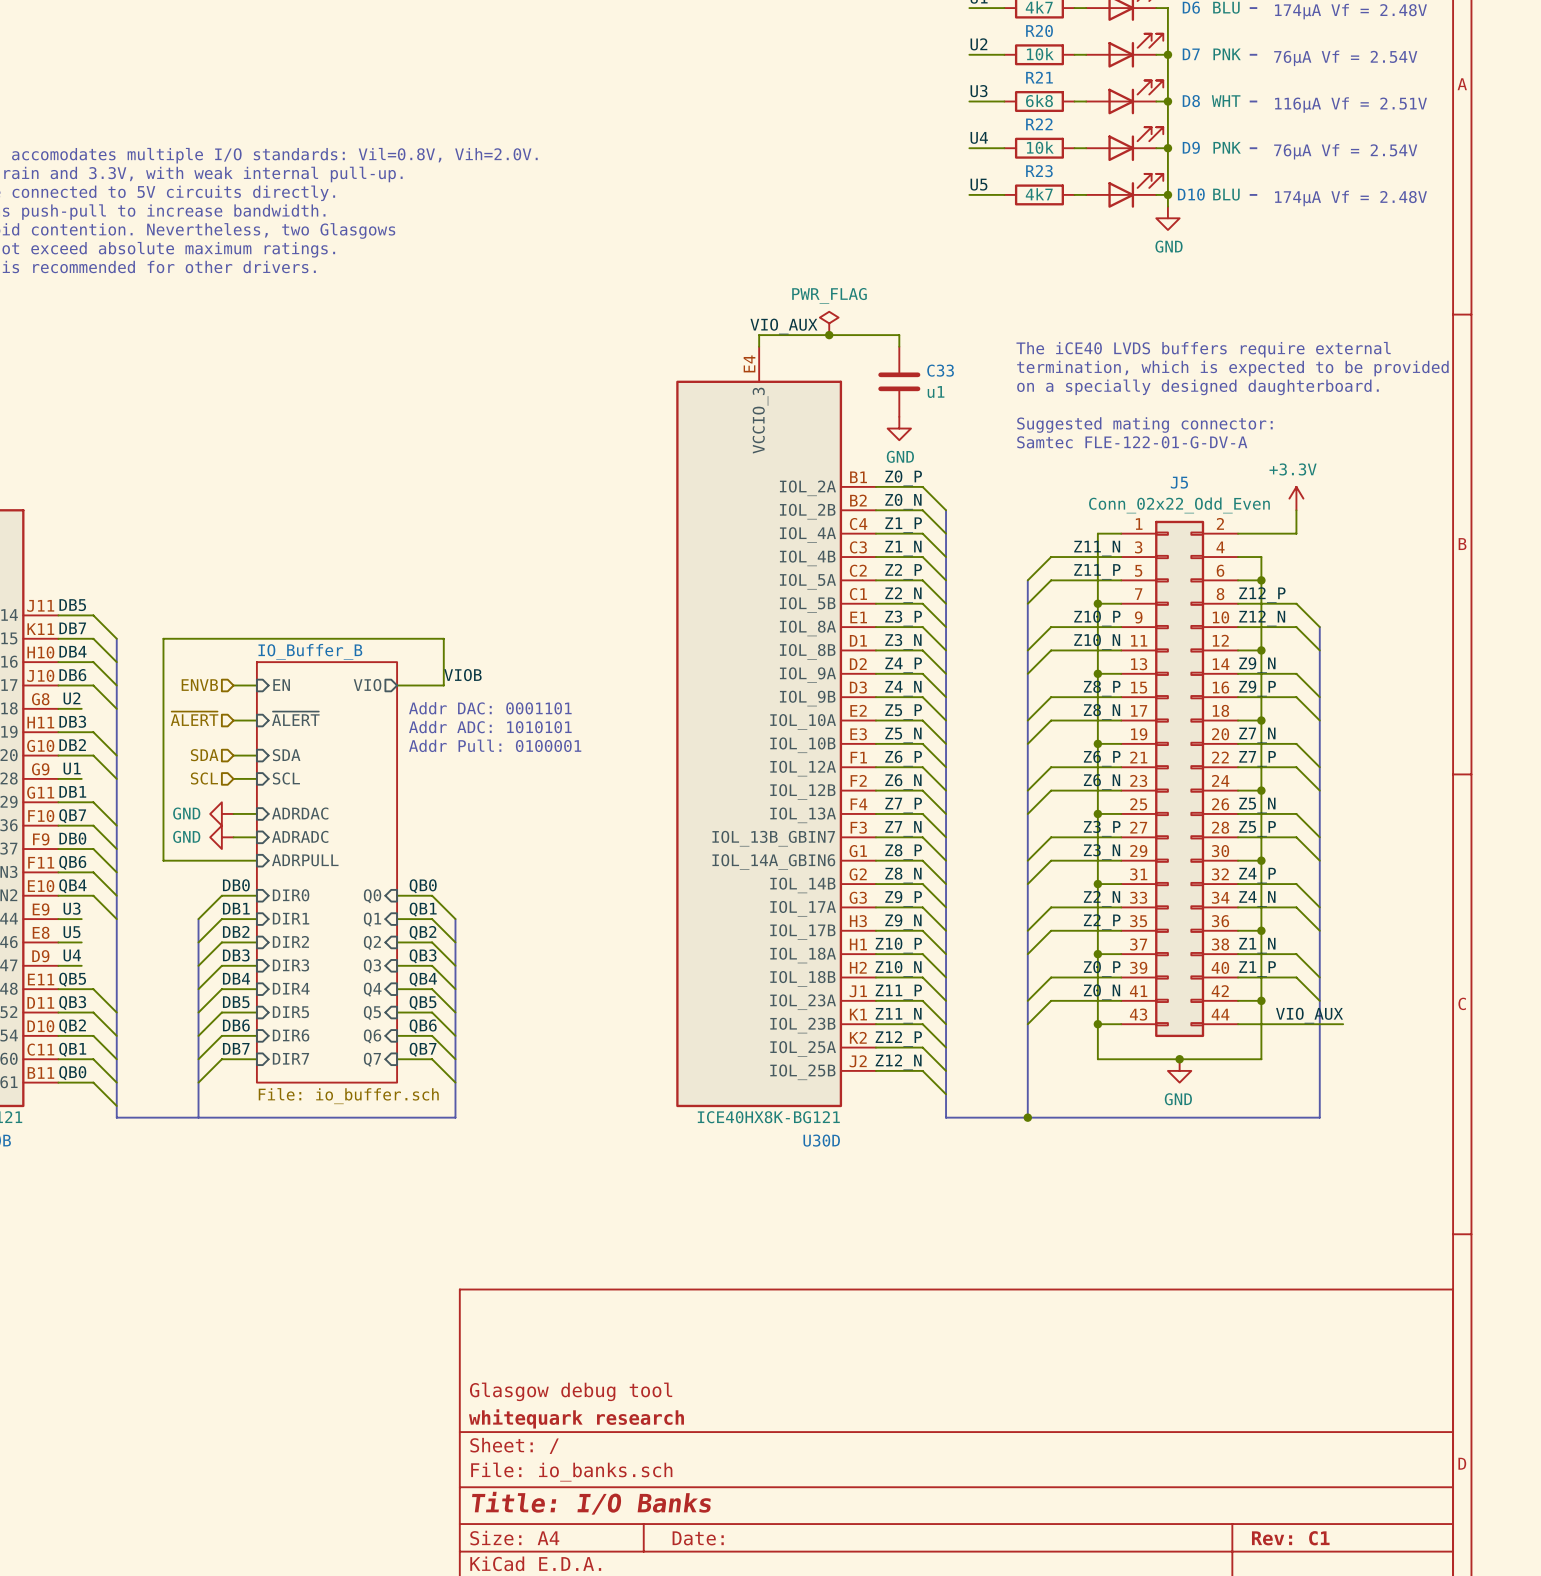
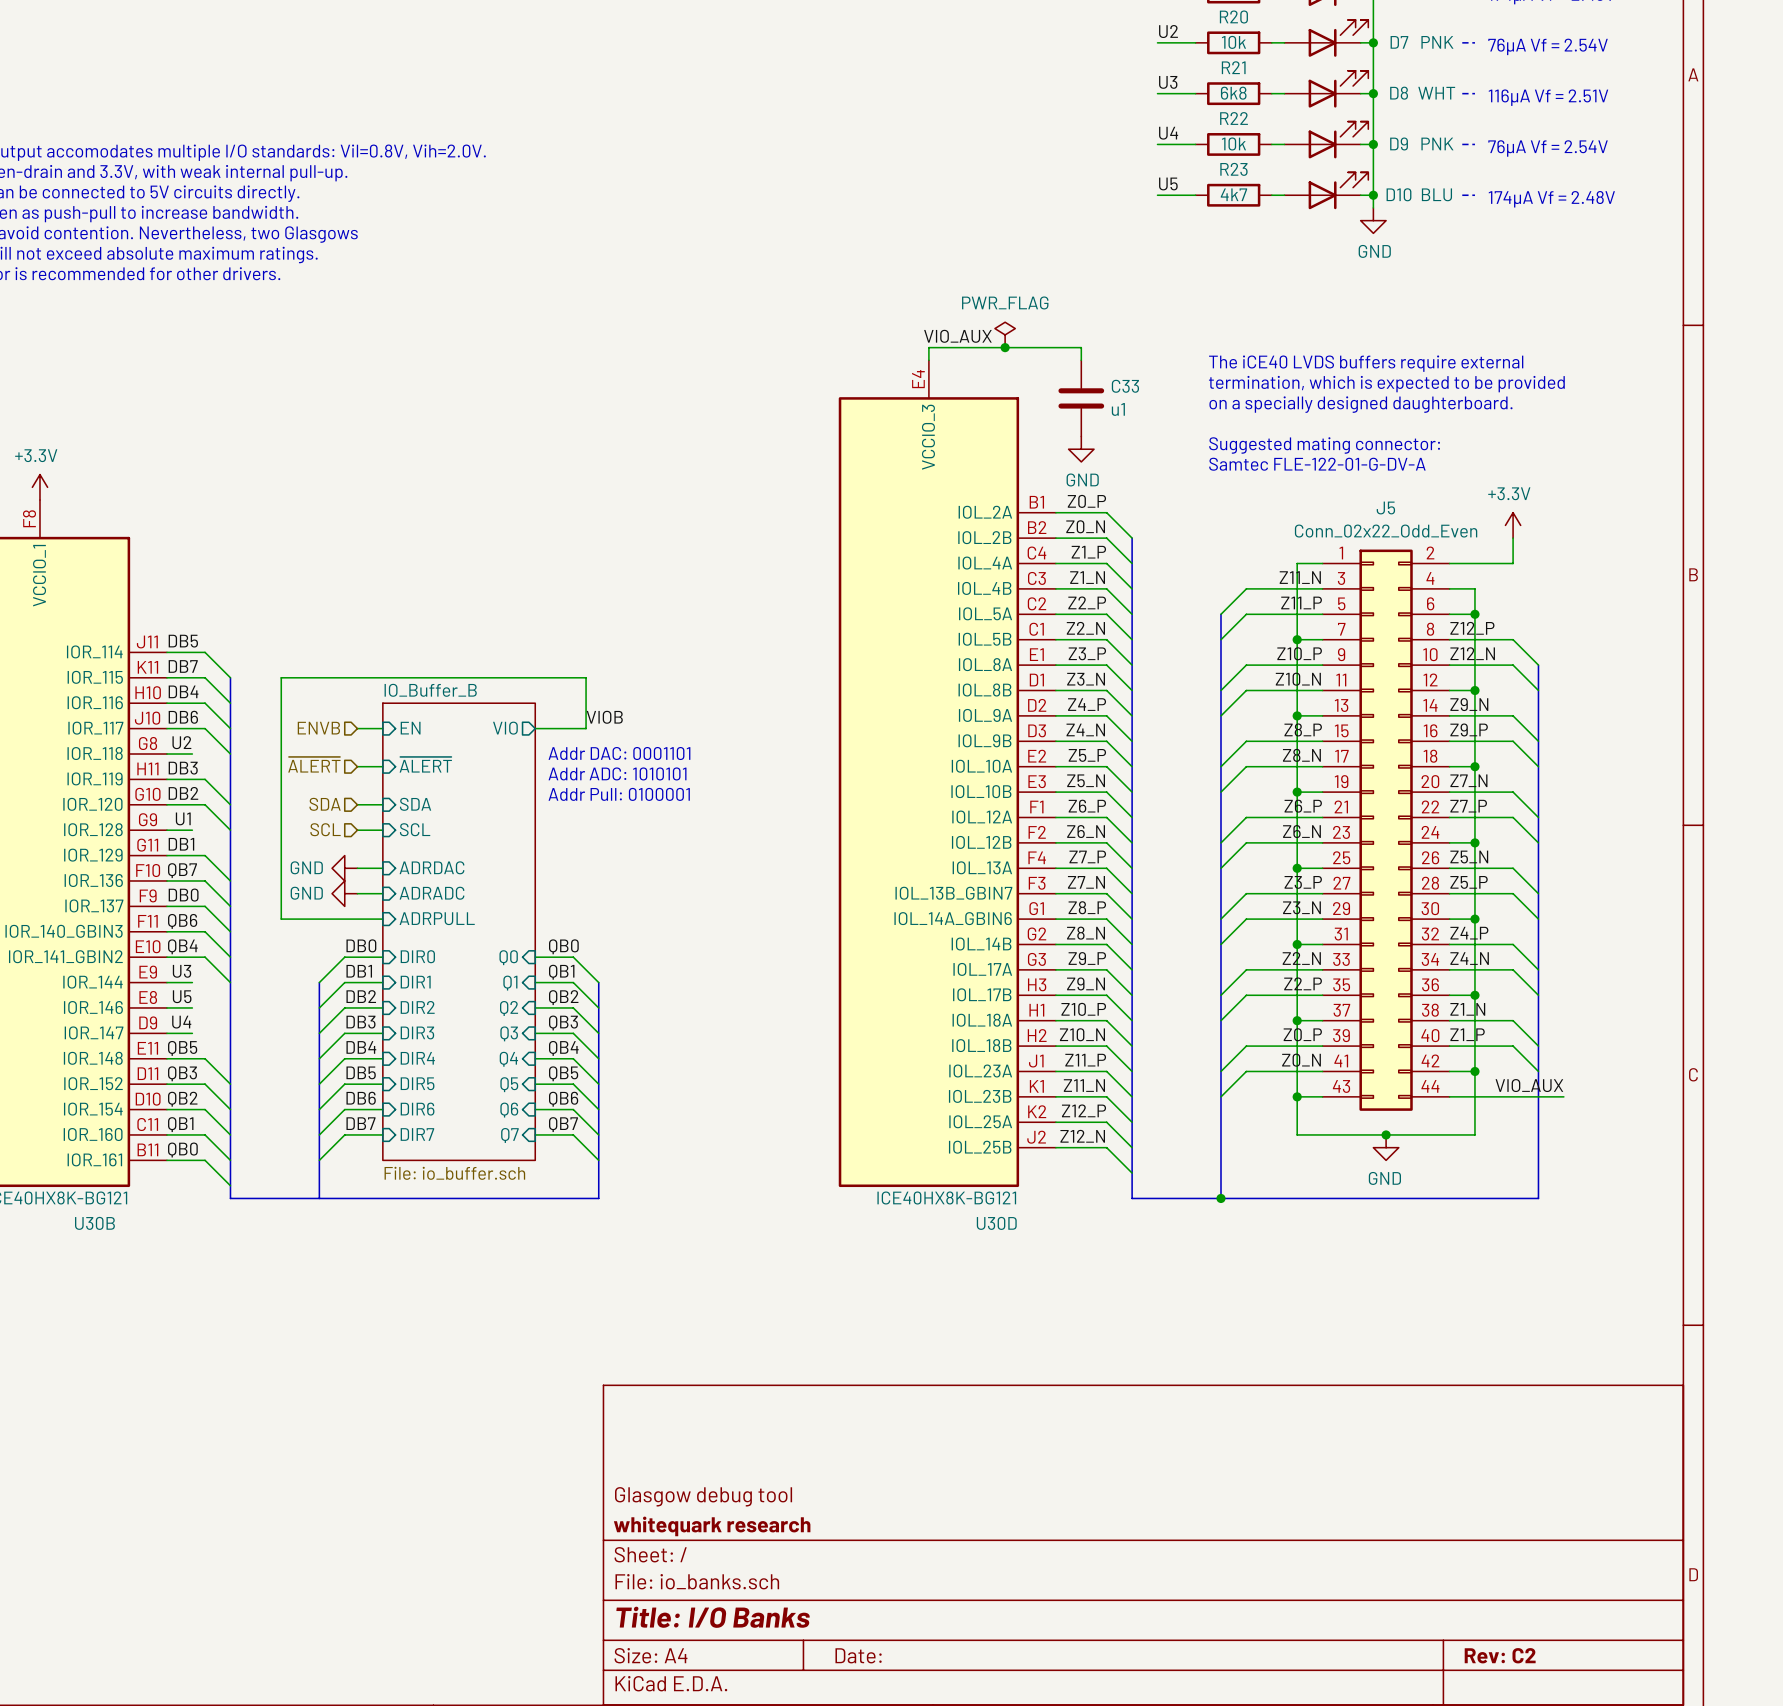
title block: Rev: C1 (1290, 1538) -> Rev: C2 (1500, 1655)

